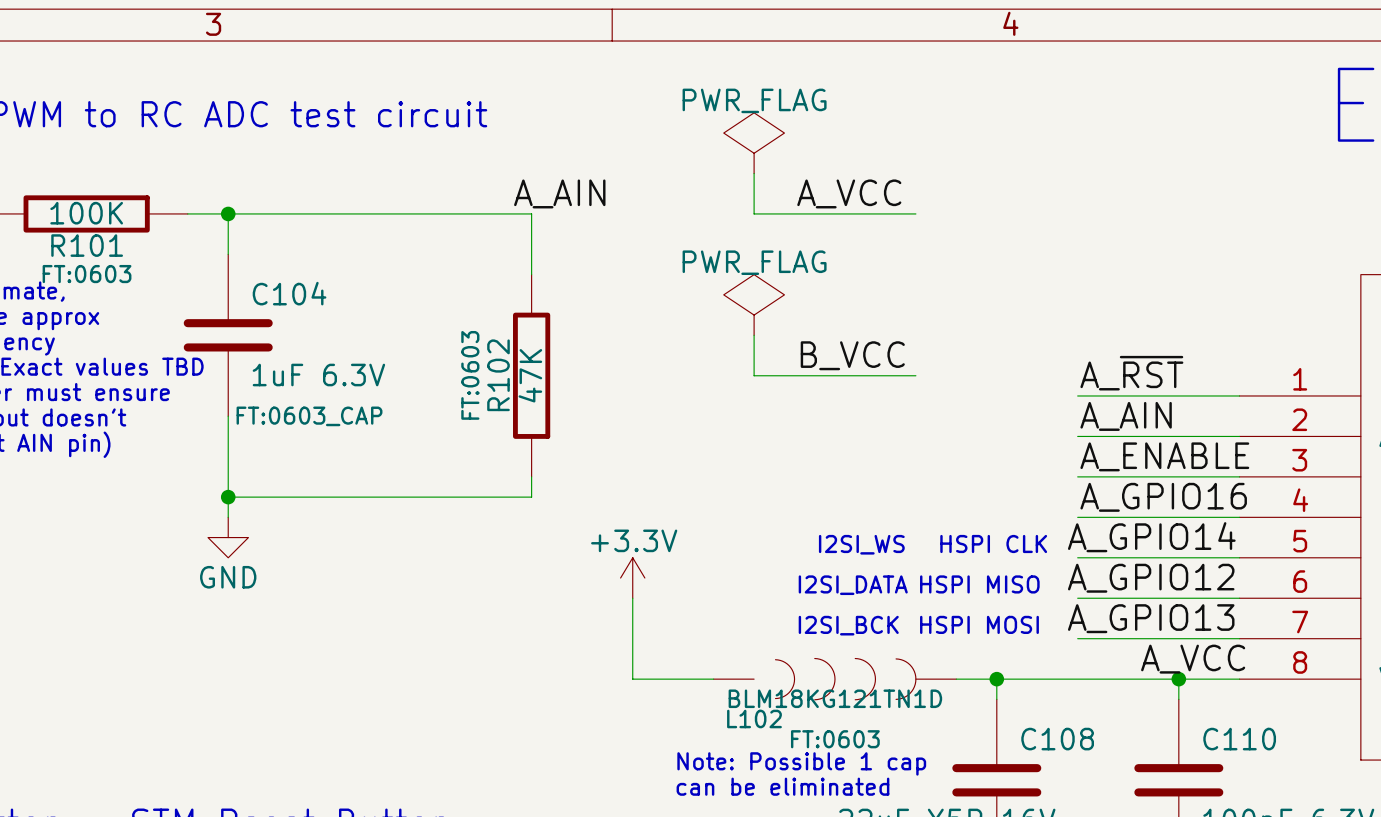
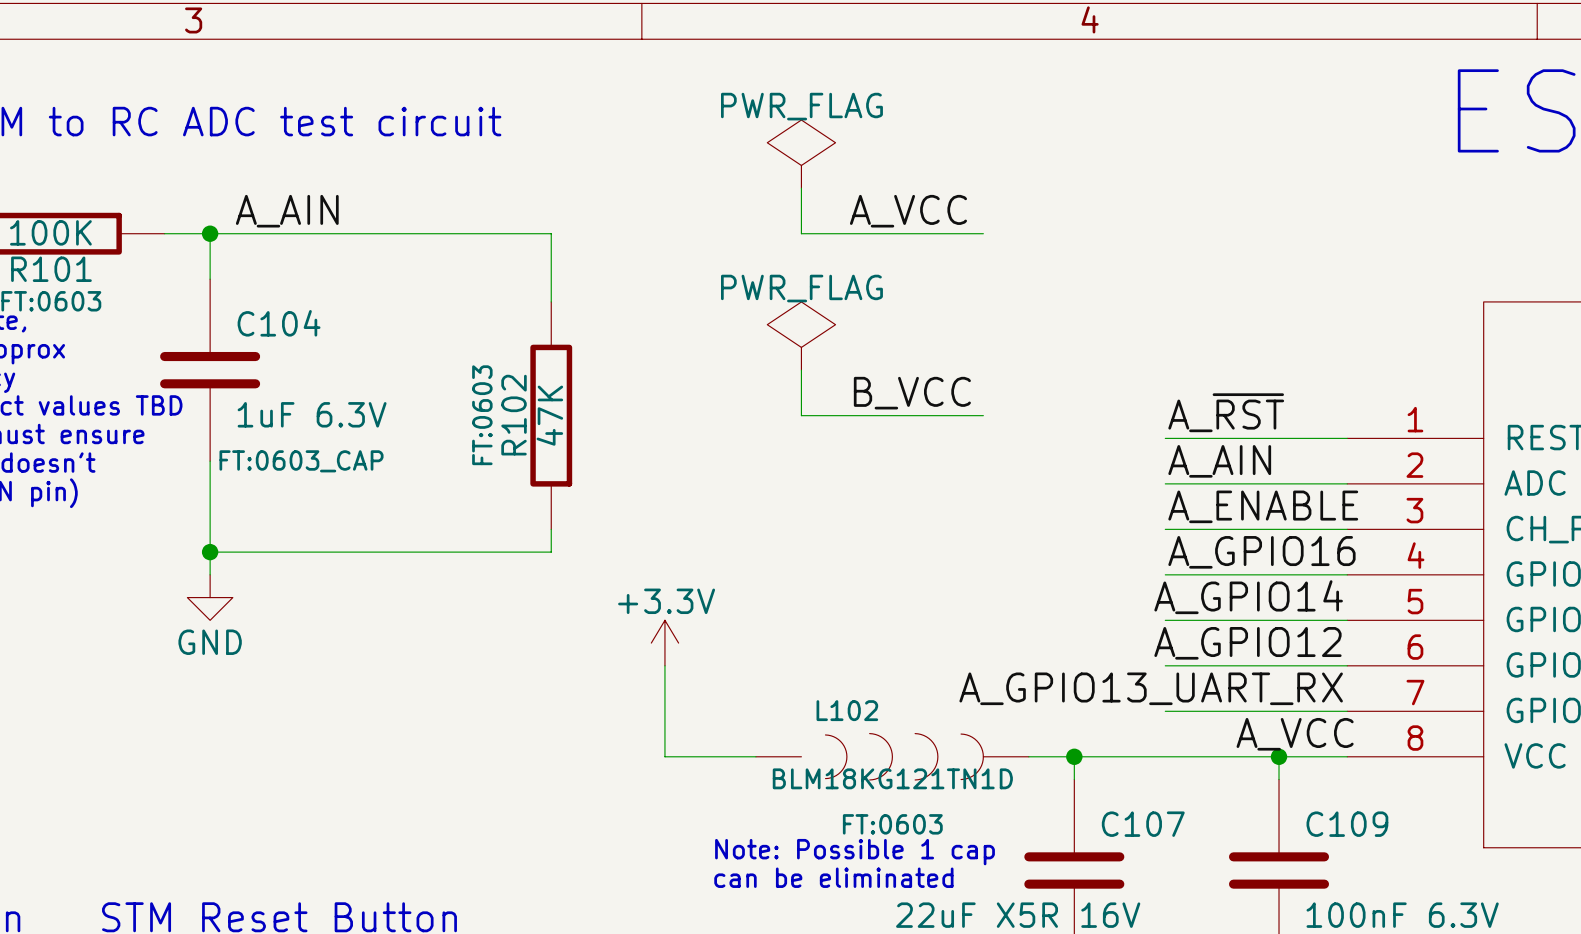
label position: A_AIN (559, 193) -> A_AIN (287, 211)
text: HSPI CLK (993, 543) -> none
text: I2SI_WS (861, 544) -> none
text: HSPI MISO (979, 584) -> none
text: I2SI_DATA (853, 585) -> none
label: A_GPIO13 (1151, 618) -> A_GPIO13_UART_RX (1151, 688)
text: HSPI MOSI (979, 624) -> none
text: I2SI_BCK (848, 625) -> none
L102 name position: L102 (754, 718) -> L102 (847, 710)
C108 name: C108 (1057, 739) -> C107 (1143, 824)
C110 name: C110 (1239, 739) -> C109 (1347, 824)

